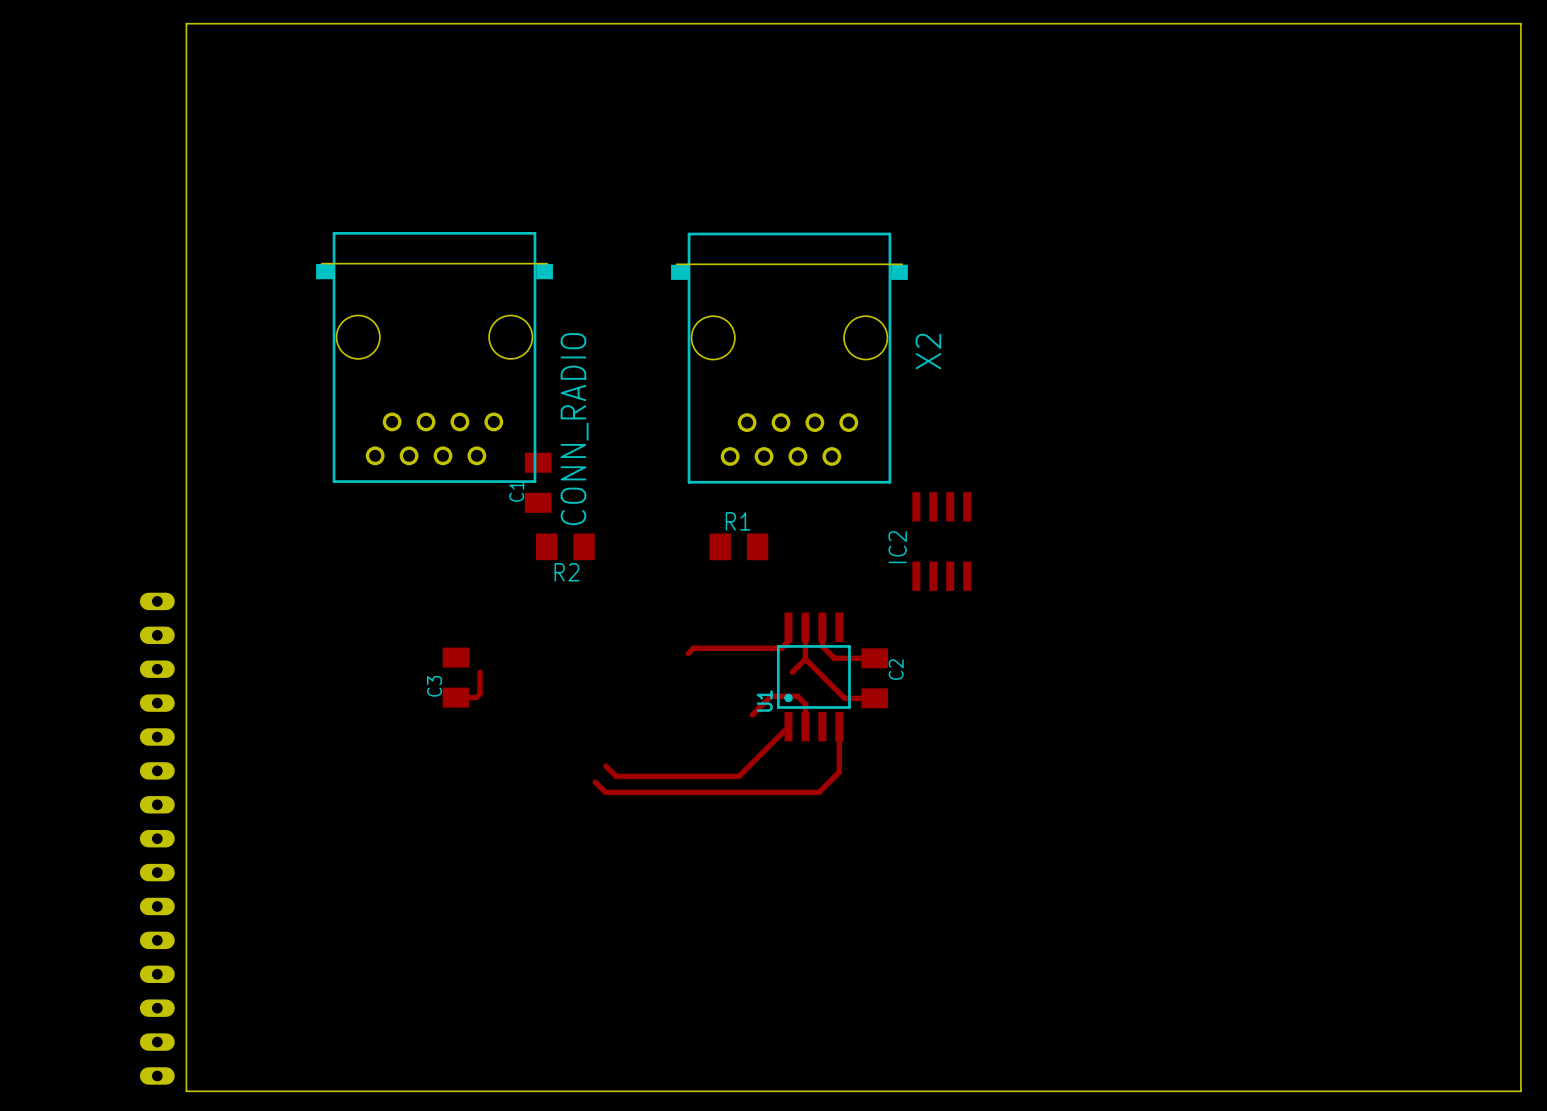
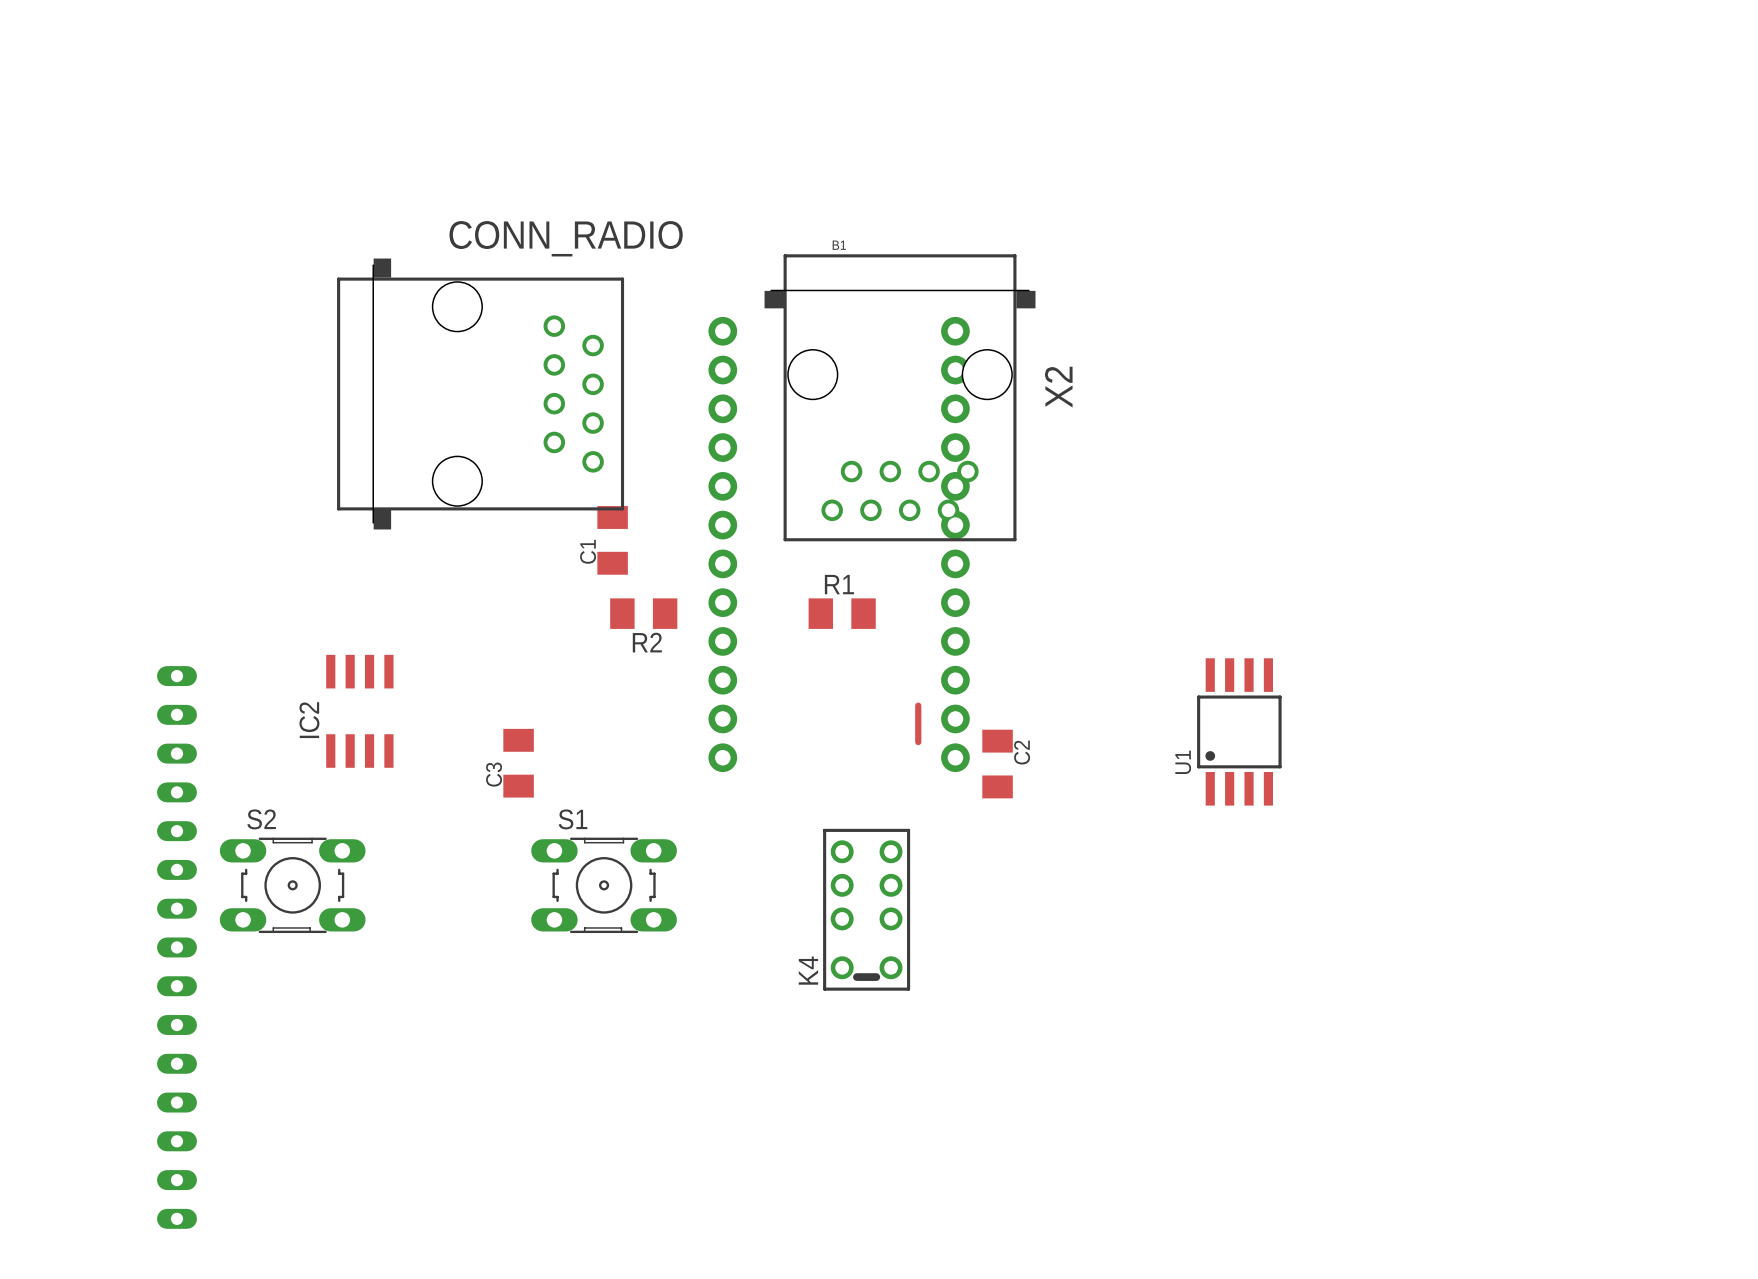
board edge: (186, 23) (1520, 23) (1520, 1091) (186, 1091) (186, 23) -> none
CONN_RADIO rotation: 0° (434, 357) -> 90° counterclockwise (480, 394)
B1: none -> (839, 544)
IC2 position: (941, 541) -> (359, 711)
top track: (788, 627) (788, 641) (781, 648) (693, 648) (688, 653) -> none
top track: (822, 627) (822, 646) (834, 658) (874, 658) -> none
top track: (480, 672) (480, 693) (476, 697) (455, 697) -> none
top track: (792, 672) (805, 659) (844, 698) (874, 698) -> none
U1 position: (813, 676) -> (1239, 731)
top track: (752, 714) (770, 696) (797, 696) (805, 704) (805, 726) -> none
top track: (788, 726) (738, 776) (616, 776) (605, 766) -> none
top track: (839, 726) (839, 772) (818, 792) (605, 792) (595, 782) -> none
S2: none -> (292, 885)
S1: none -> (604, 885)
K4: none -> (866, 909)

